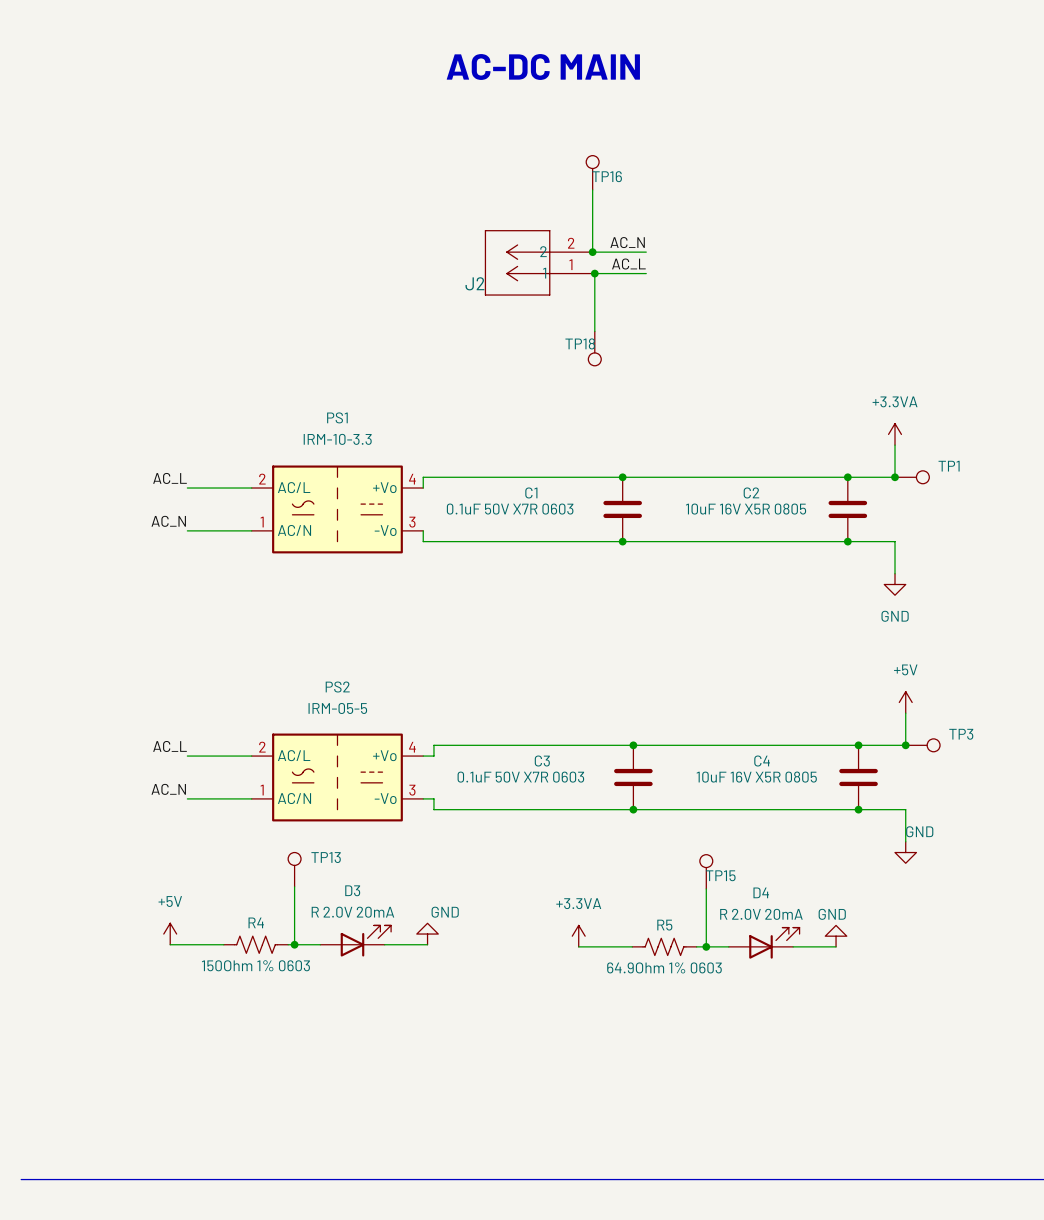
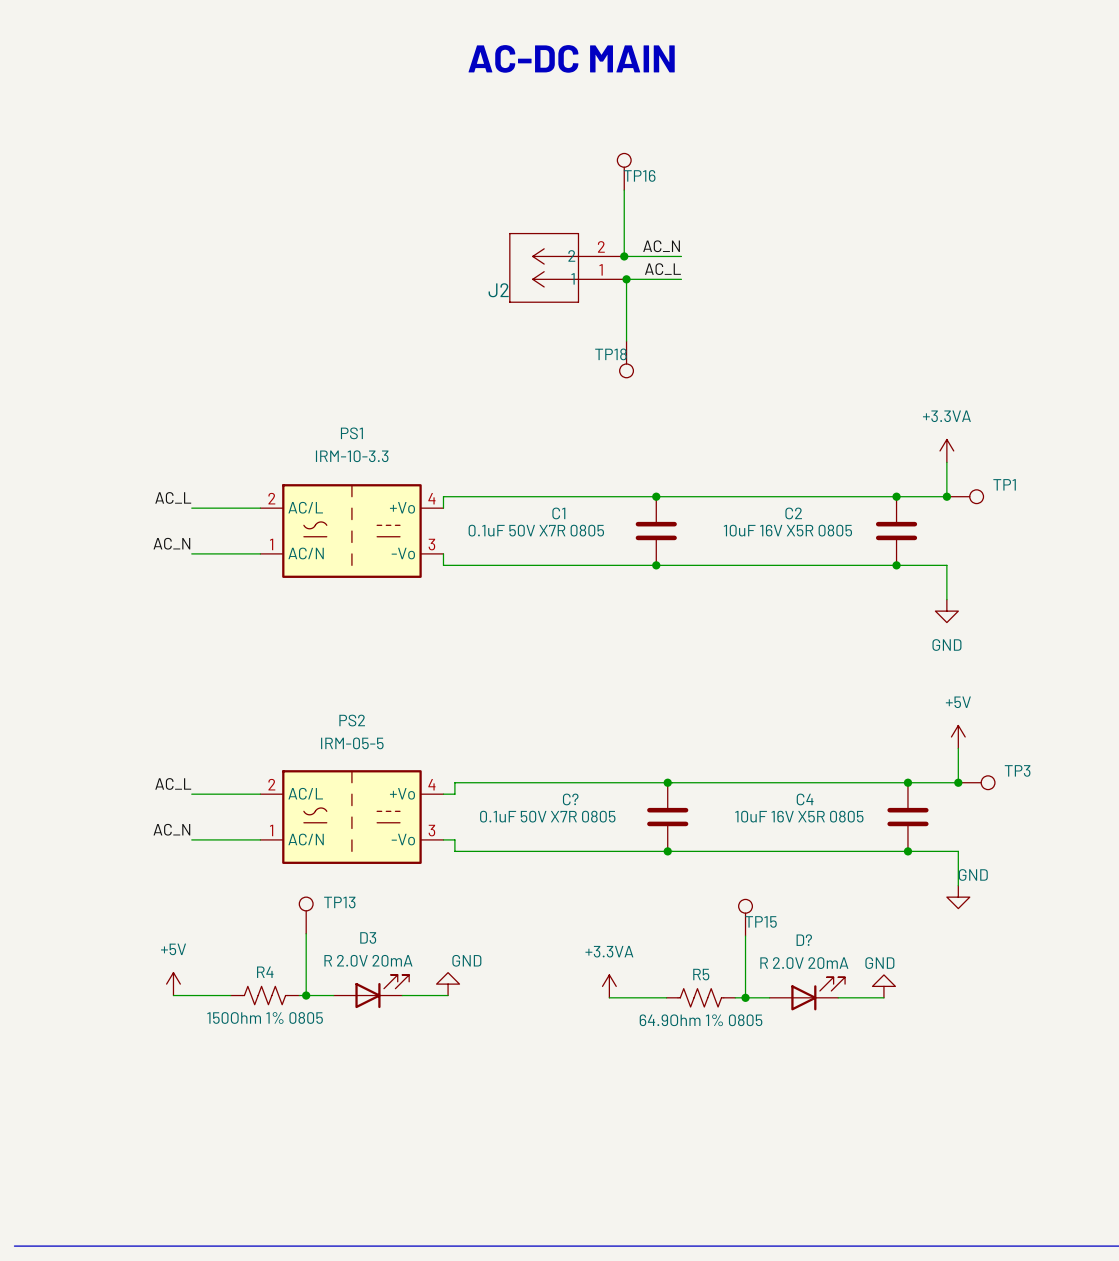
C1 value: 0.1uF 50V X7R 0603 (510, 509) -> 0.1uF 50V X7R 0805 (536, 530)
C3 name: C3 (542, 761) -> C? (570, 799)
C3 value: 0.1uF 50V X7R 0603 (520, 777) -> 0.1uF 50V X7R 0805 (547, 816)
D4 name: D4 (761, 892) -> D? (804, 940)
R4 value: 150Ohm 1% 0603 (255, 965) -> 150Ohm 1% 0805 (265, 1017)
R5 value: 64.9Ohm 1% 0603 (664, 967) -> 64.9Ohm 1% 0805 (701, 1020)

